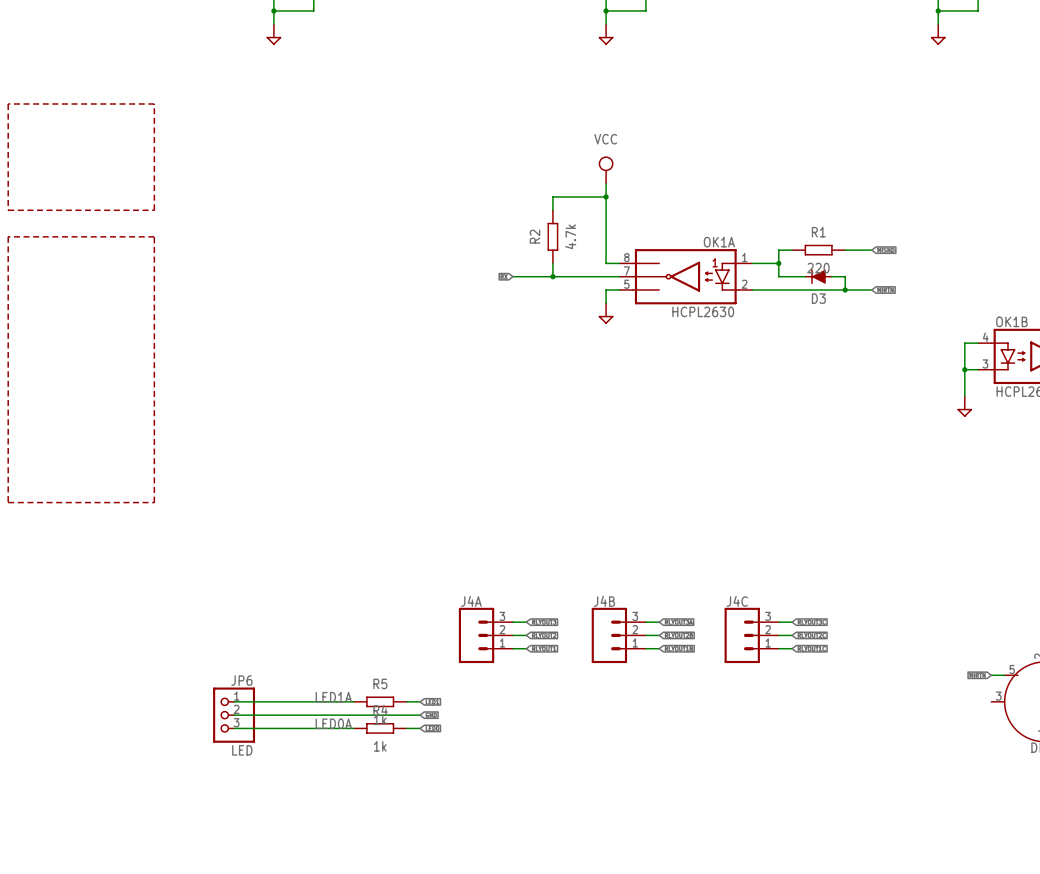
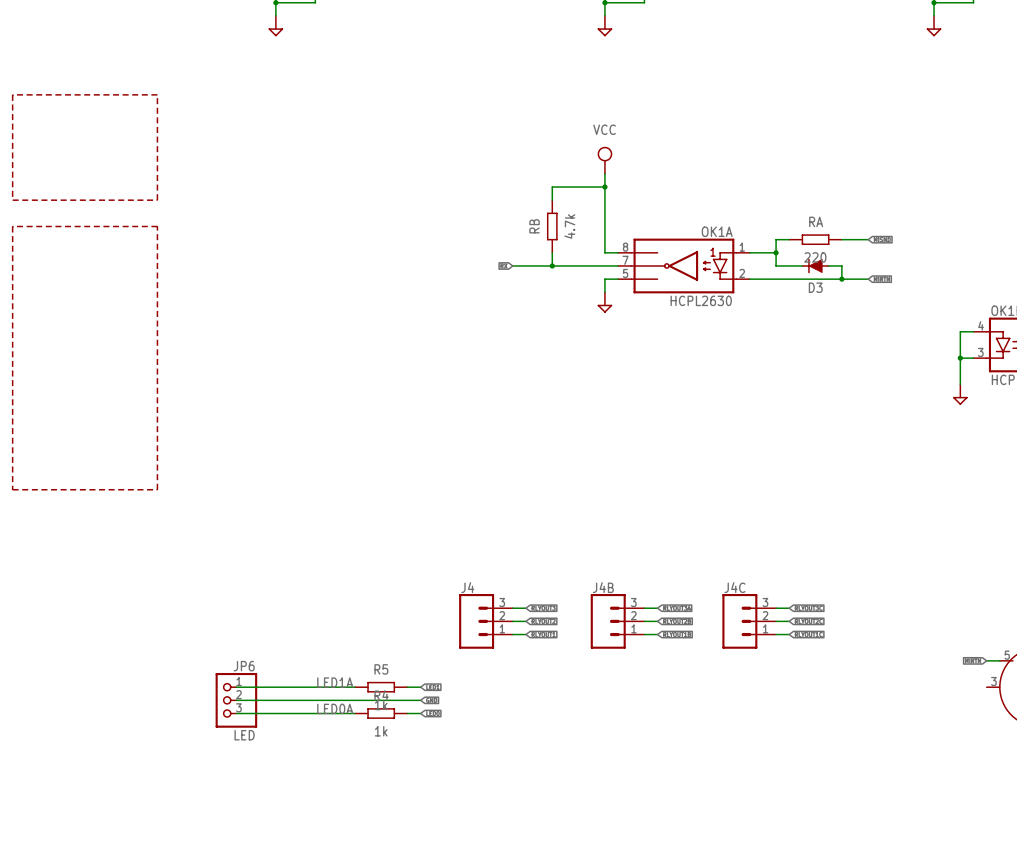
R1 name: R1 (818, 232) -> RA (816, 221)
R2 name: R2 (534, 236) -> RB (534, 226)
J4A name: J4A (471, 601) -> J4 (467, 587)

